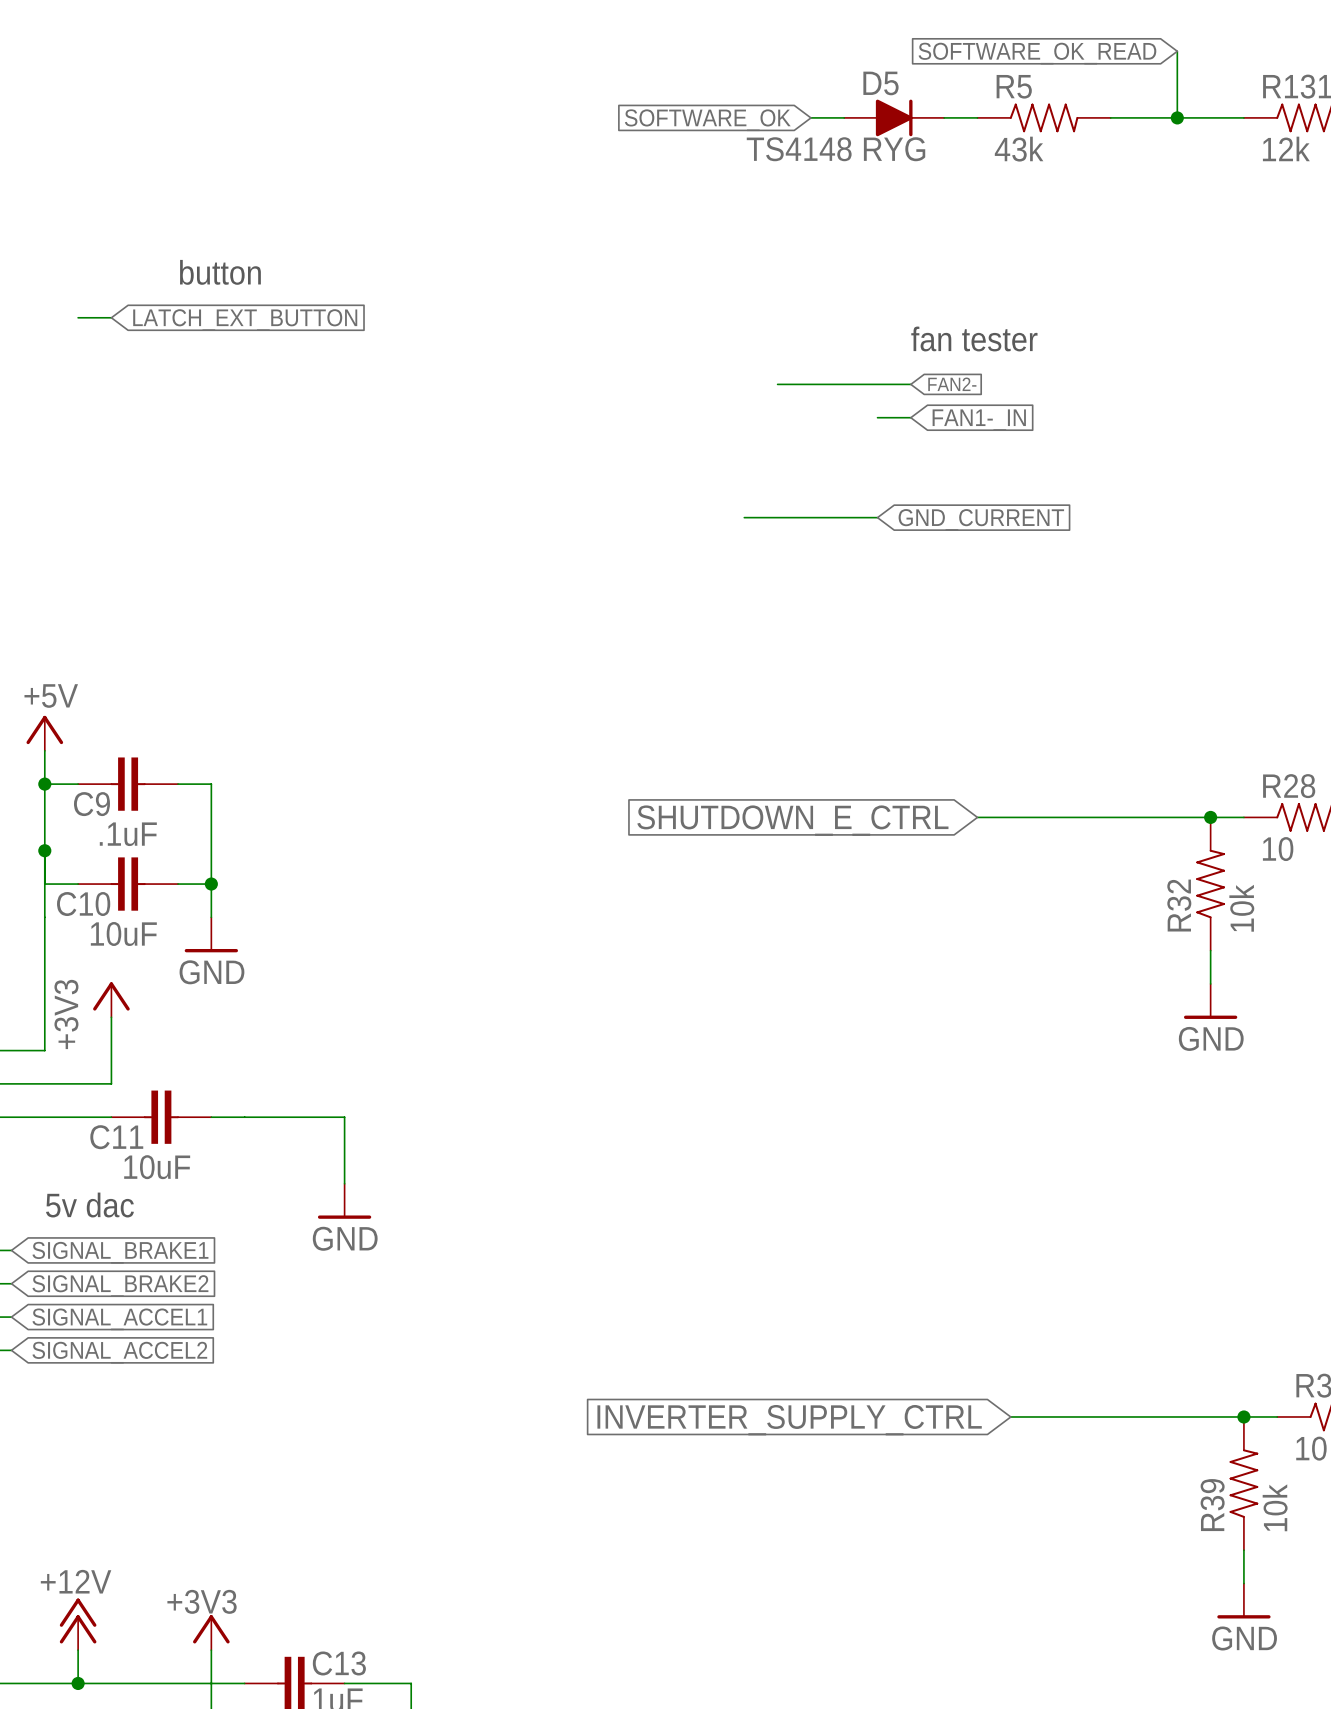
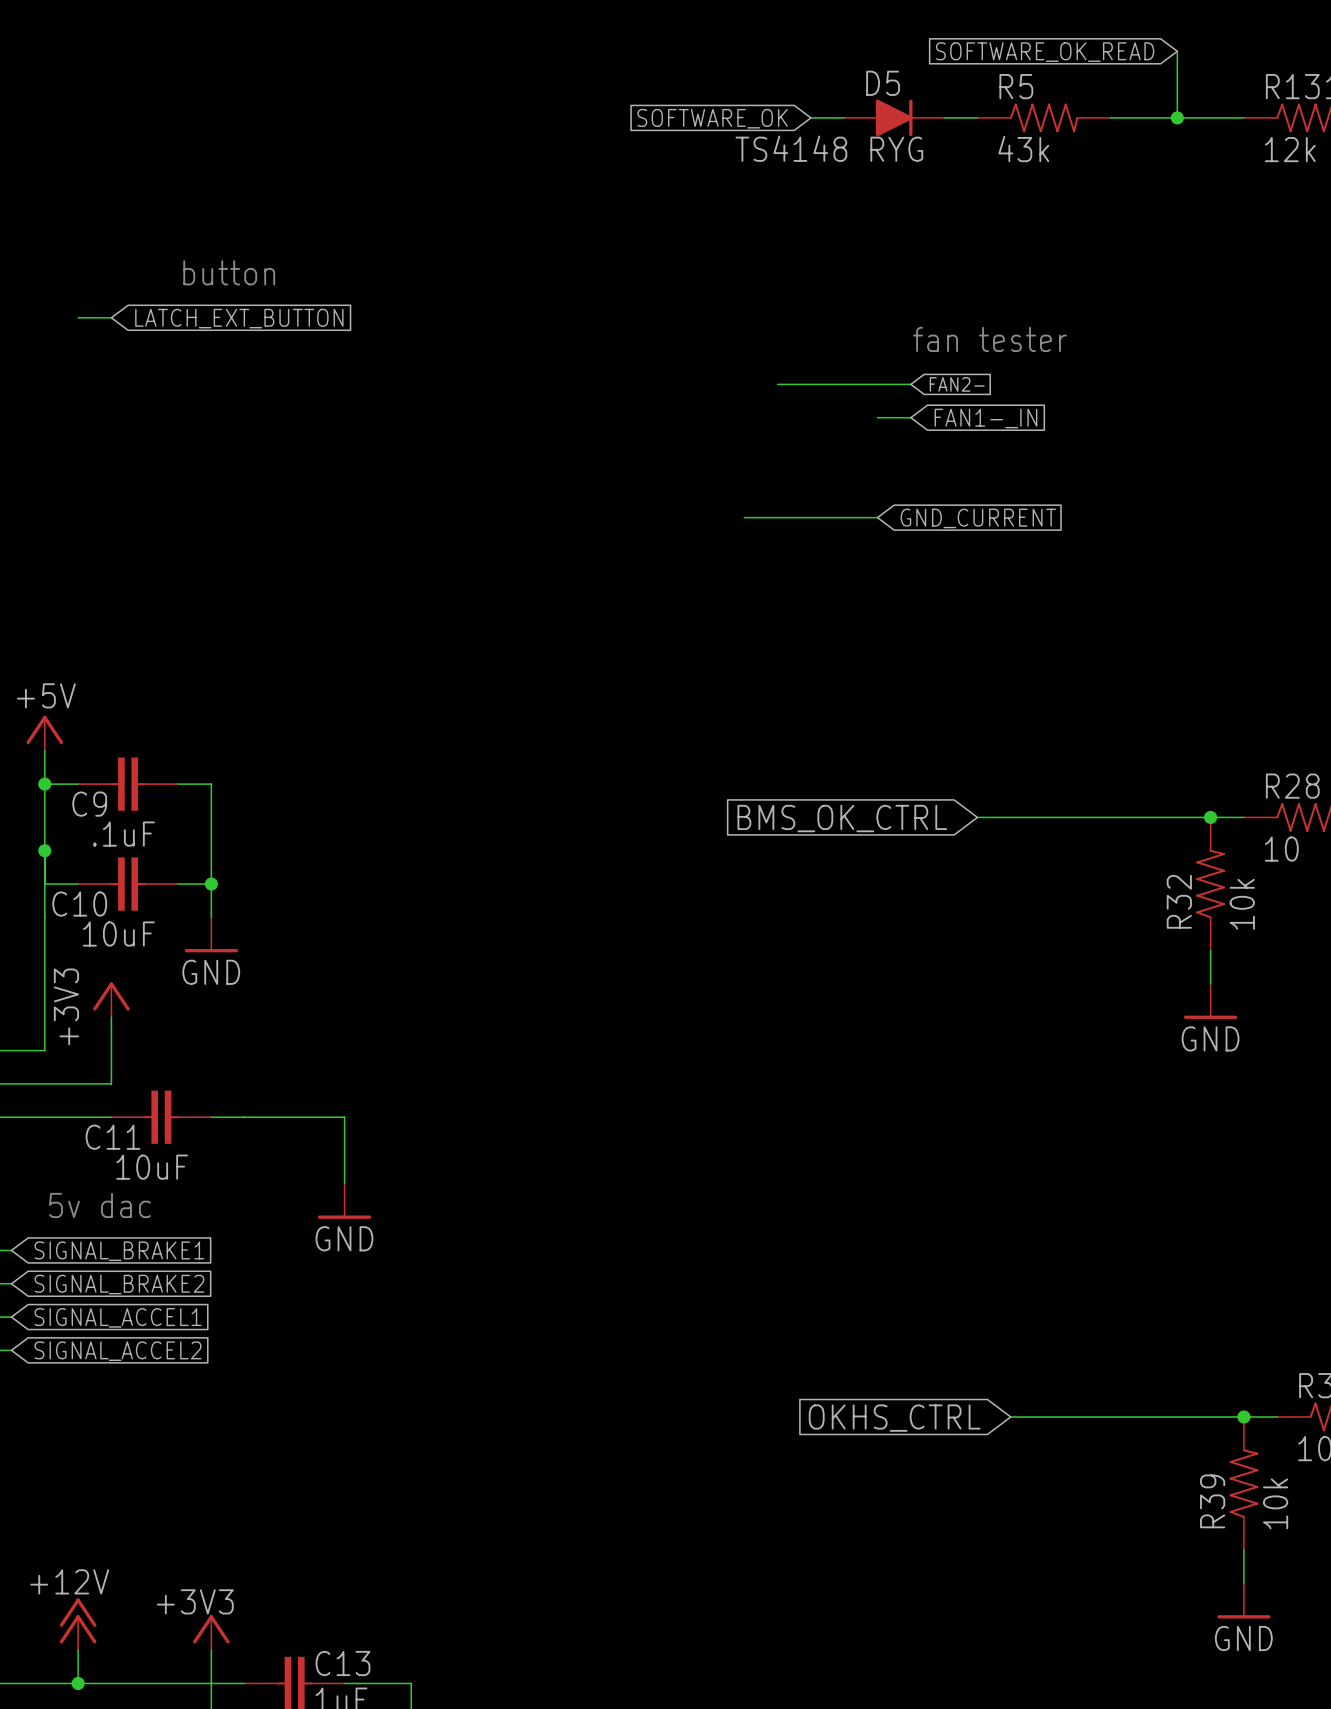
global label: SHUTDOWN_E_CTRL (792, 820) -> BMS_OK_CTRL (842, 818)
global label: INVERTER_SUPPLY_CTRL (789, 1420) -> OKHS_CTRL (894, 1418)

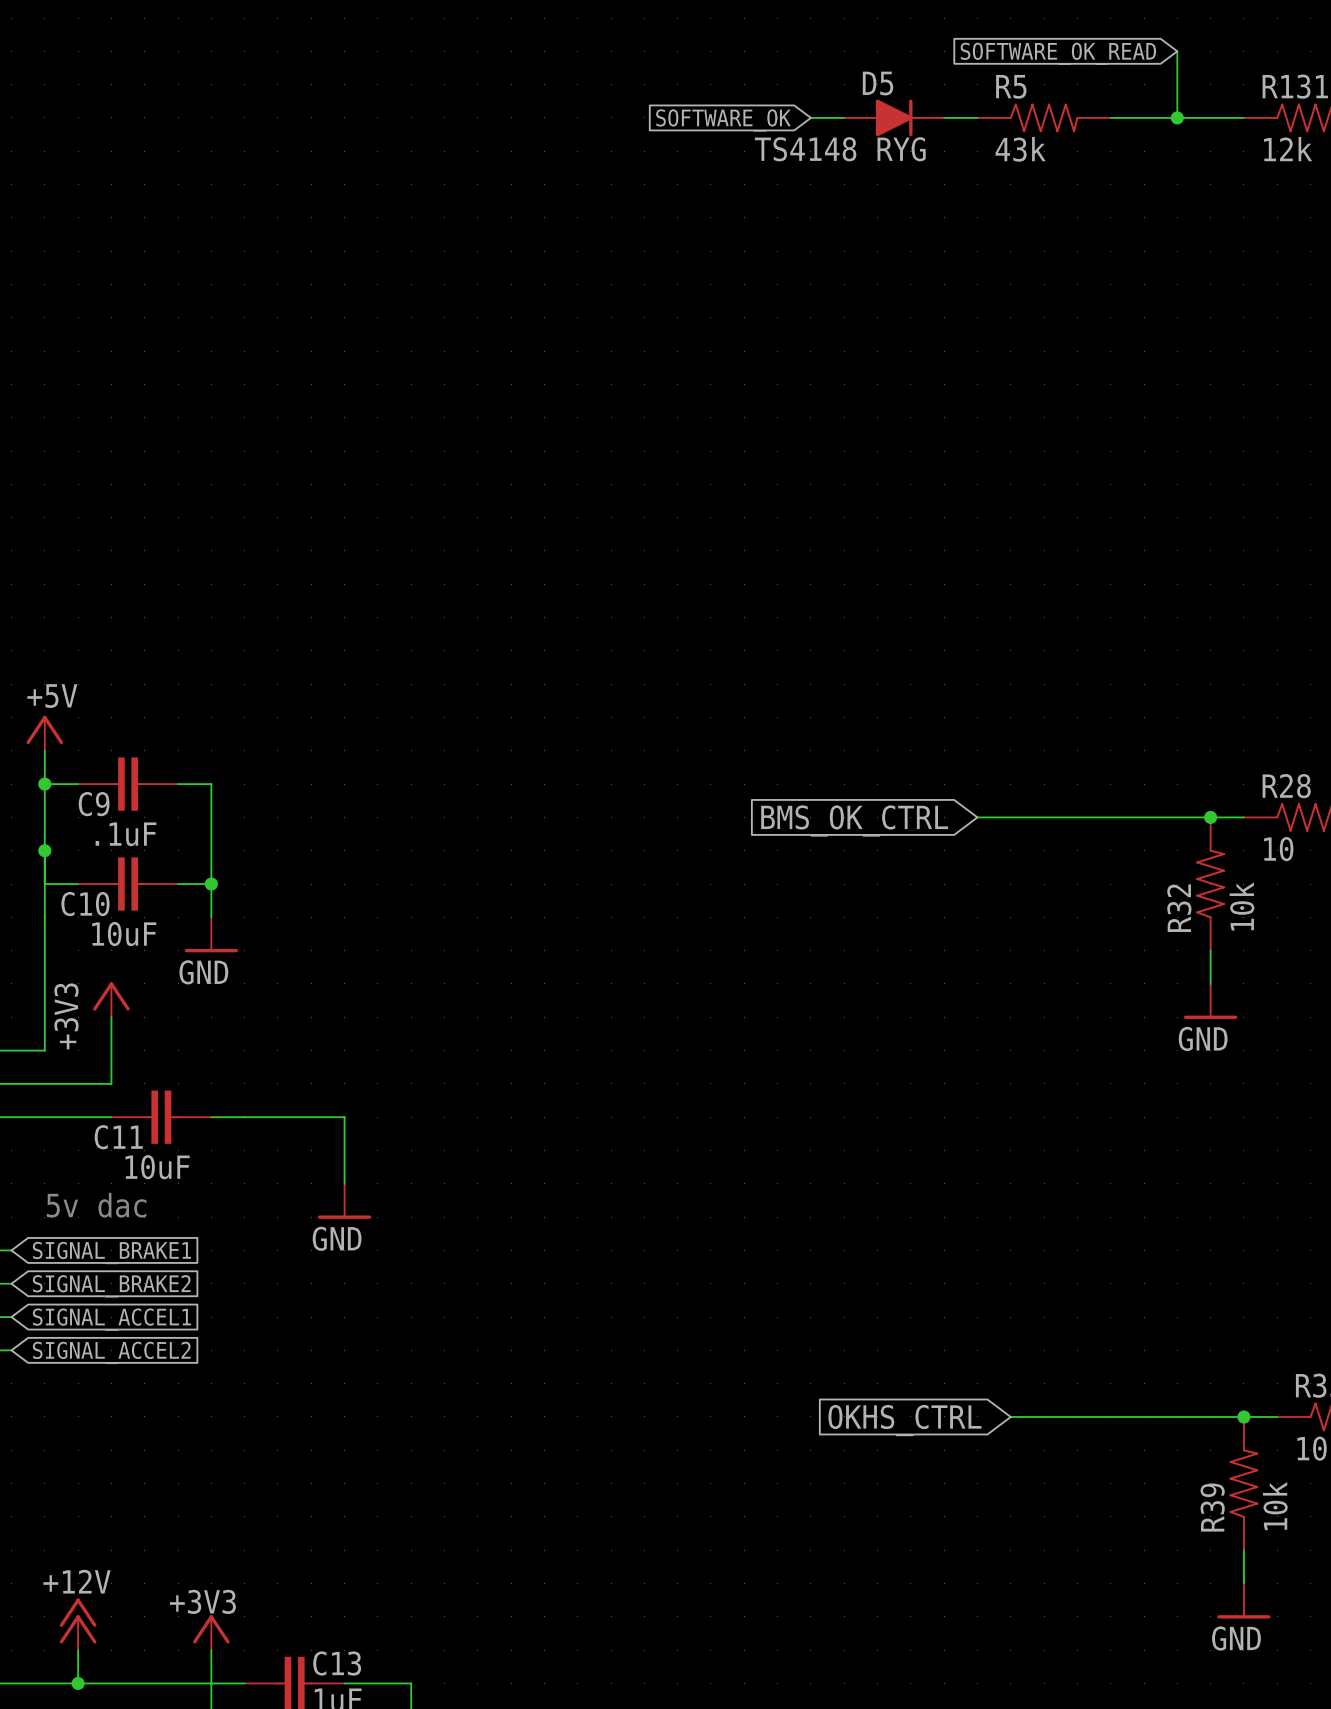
text: button (229, 272) -> none
wire: (78, 317) (111, 317) -> none
global label: LATCH_EXT_BUTTON (239, 318) -> none
text: fan tester (990, 339) -> none
wire: (777, 384) (910, 384) -> none
global label: FAN2- (957, 384) -> none
wire: (877, 417) (910, 417) -> none
global label: FAN1-_IN (985, 418) -> none
wire: (744, 517) (877, 517) -> none
global label: GND_CURRENT (978, 518) -> none

